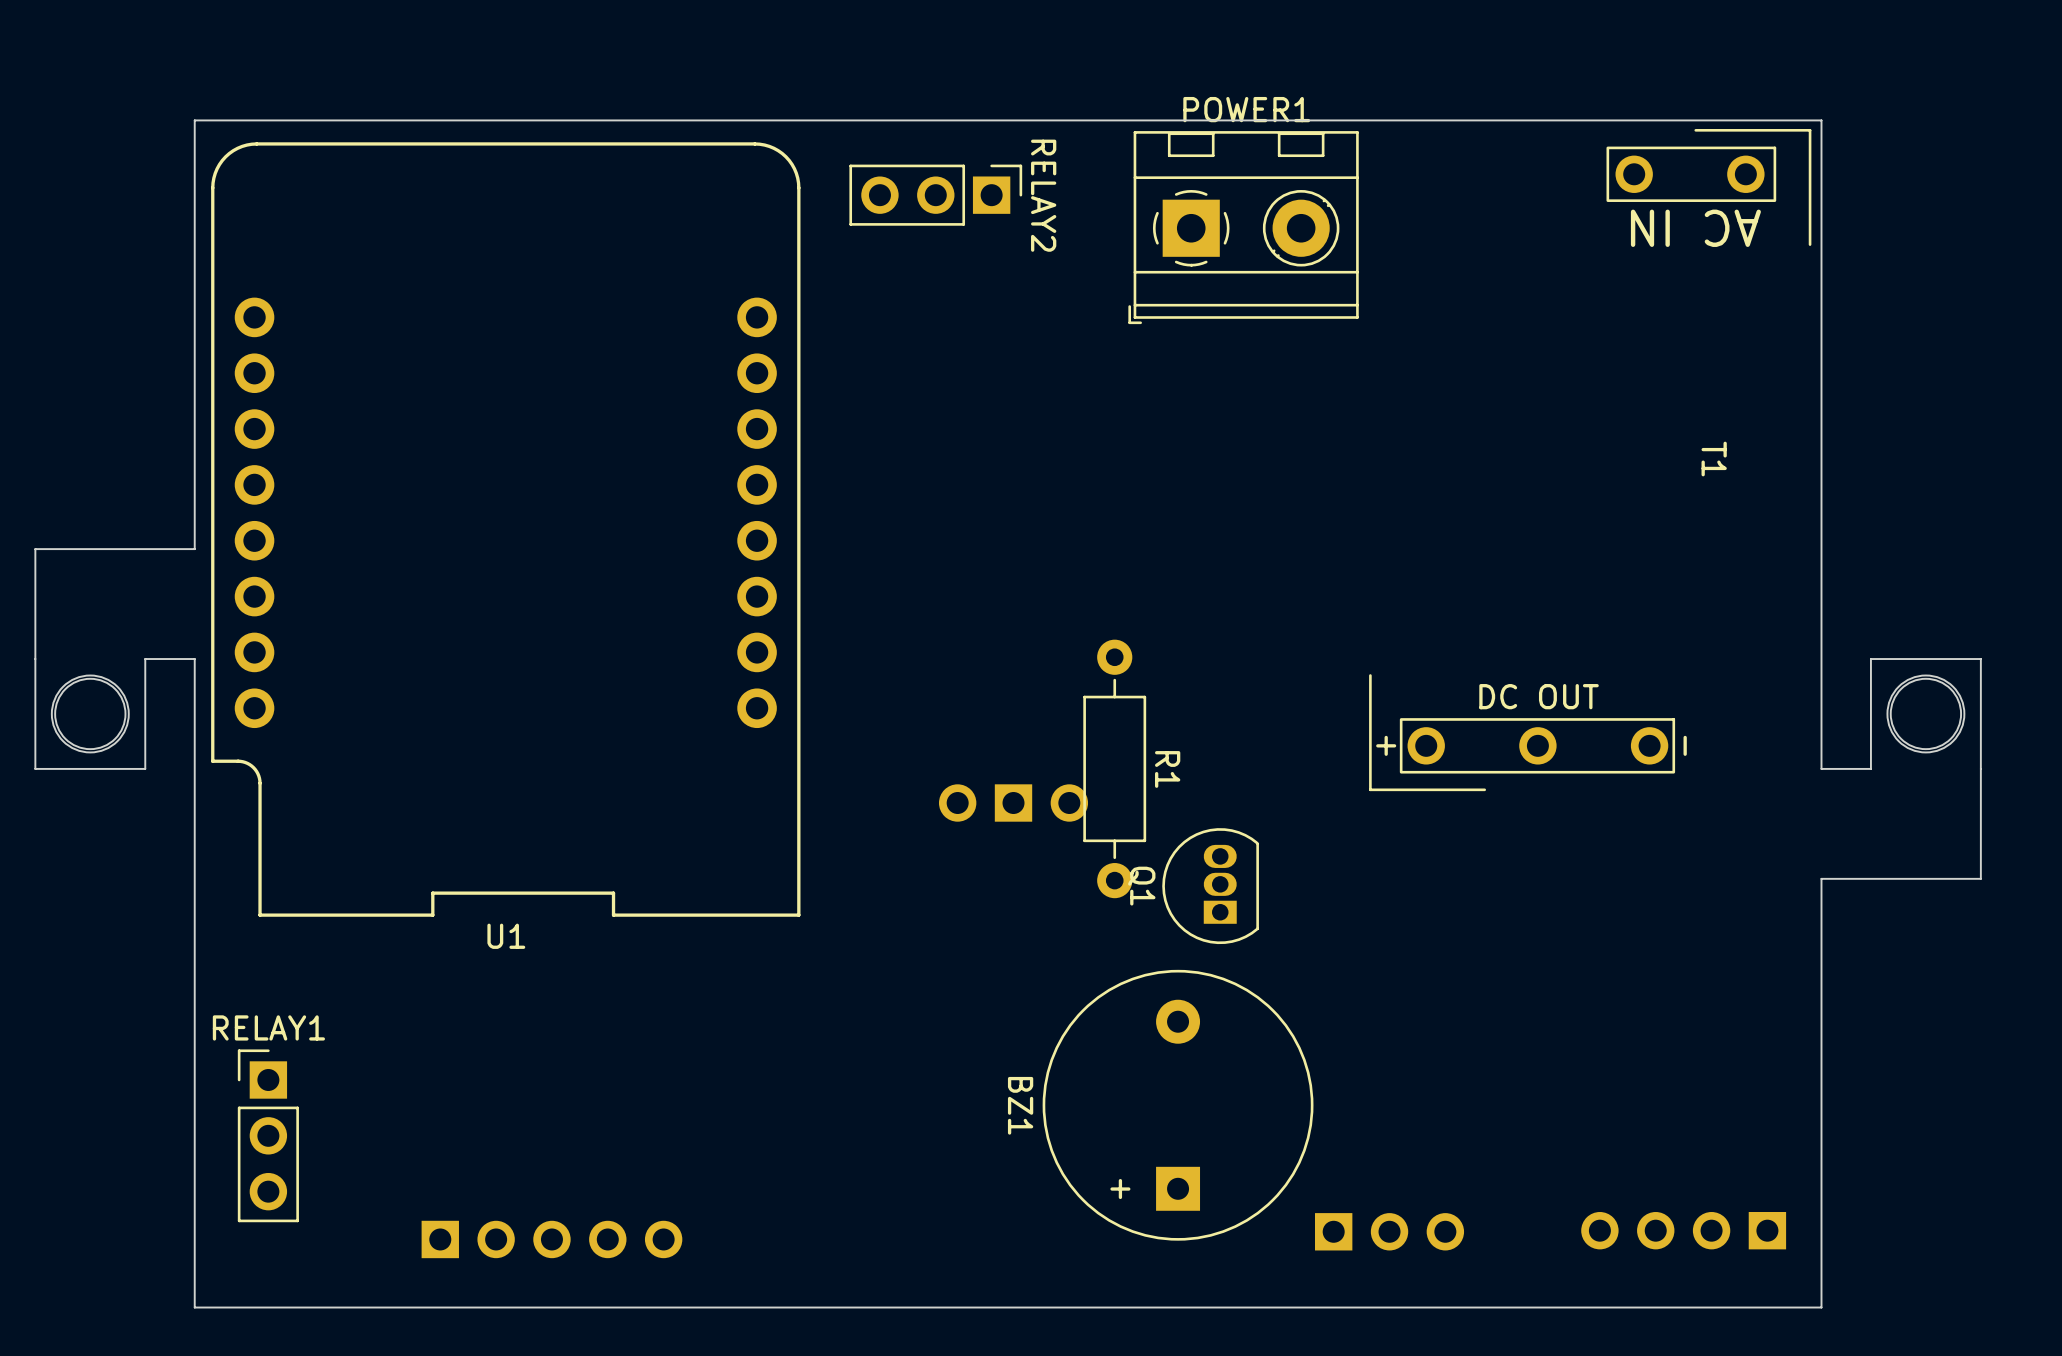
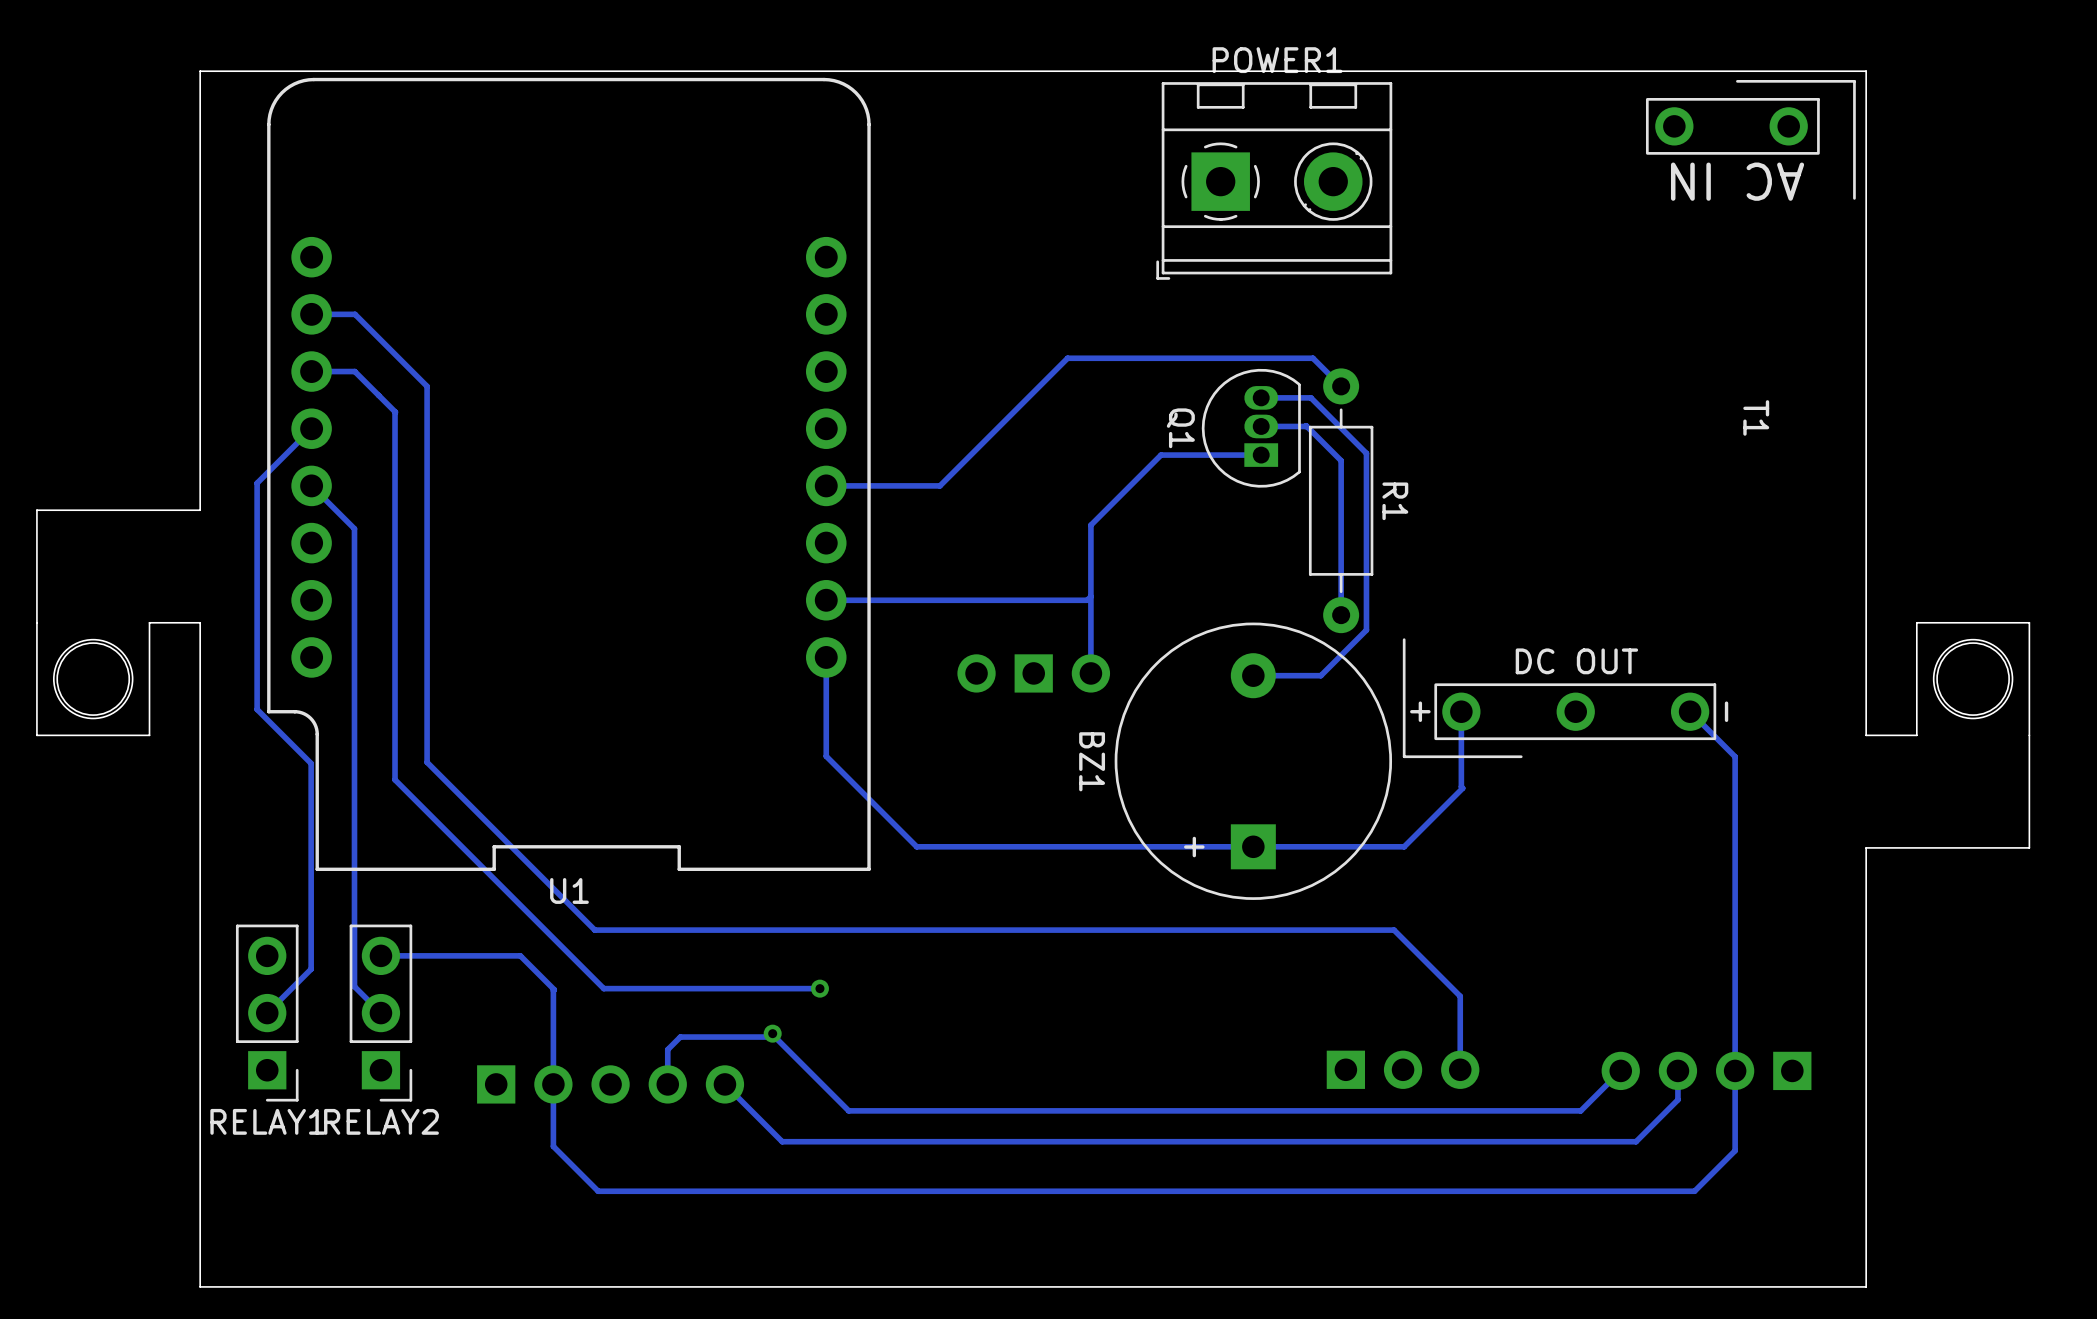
RELAY2 rotation: 0° (935, 195) -> 90° clockwise (380, 1013)
RELAY2 position: (935, 195) -> (380, 1013)
track: none -> (311, 314) (355, 314) (427, 386) (427, 762) (594, 930) (1394, 930) (1460, 996) (1460, 1069)
track: none -> (311, 371) (354, 371) (395, 412)
track: none -> (1341, 386) (1313, 358) (1067, 358) (939, 485) (826, 485)
track: none -> (1261, 397) (1310, 397) (1366, 453) (1366, 630) (1320, 675) (1253, 675)
track: none -> (395, 411) (395, 779) (603, 988) (819, 988)
track: none -> (1261, 426) (1306, 425) (1341, 460) (1341, 615)
track: none -> (311, 428) (257, 483) (257, 709) (311, 763) (311, 969) (267, 1013)
track: none -> (1261, 455) (1161, 455) (1090, 525) (1090, 673)
track: none -> (311, 485) (354, 528) (354, 986) (380, 1013)
U1 position: (505, 529) -> (568, 474)
track: none -> (1090, 596) (1087, 600) (826, 600)
track: none -> (826, 657) (826, 756) (916, 846) (1404, 846) (1462, 788) (1461, 711)
track: none -> (1690, 711) (1735, 756) (1735, 1150) (1694, 1191) (598, 1191) (553, 1146) (554, 989) (520, 955) (380, 955)
R1 position: (1114, 768) -> (1341, 500)
part position: (1013, 803) -> (1033, 673)
Q1 position: (1210, 886) -> (1251, 428)
via: none -> (819, 988)
via: none -> (772, 1033)
track: none -> (1620, 1070) (1580, 1110) (848, 1110) (774, 1037) (680, 1037) (667, 1049) (667, 1084)
track: none -> (1677, 1070) (1677, 1099) (1636, 1141) (782, 1141) (724, 1084)
BZ1 position: (1178, 1105) -> (1253, 761)
RELAY1 rotation: 0° (268, 1135) -> 180° (267, 1013)
part position: (1683, 1230) -> (1706, 1070)
part position: (1389, 1231) -> (1403, 1069)
part position: (551, 1239) -> (610, 1084)

